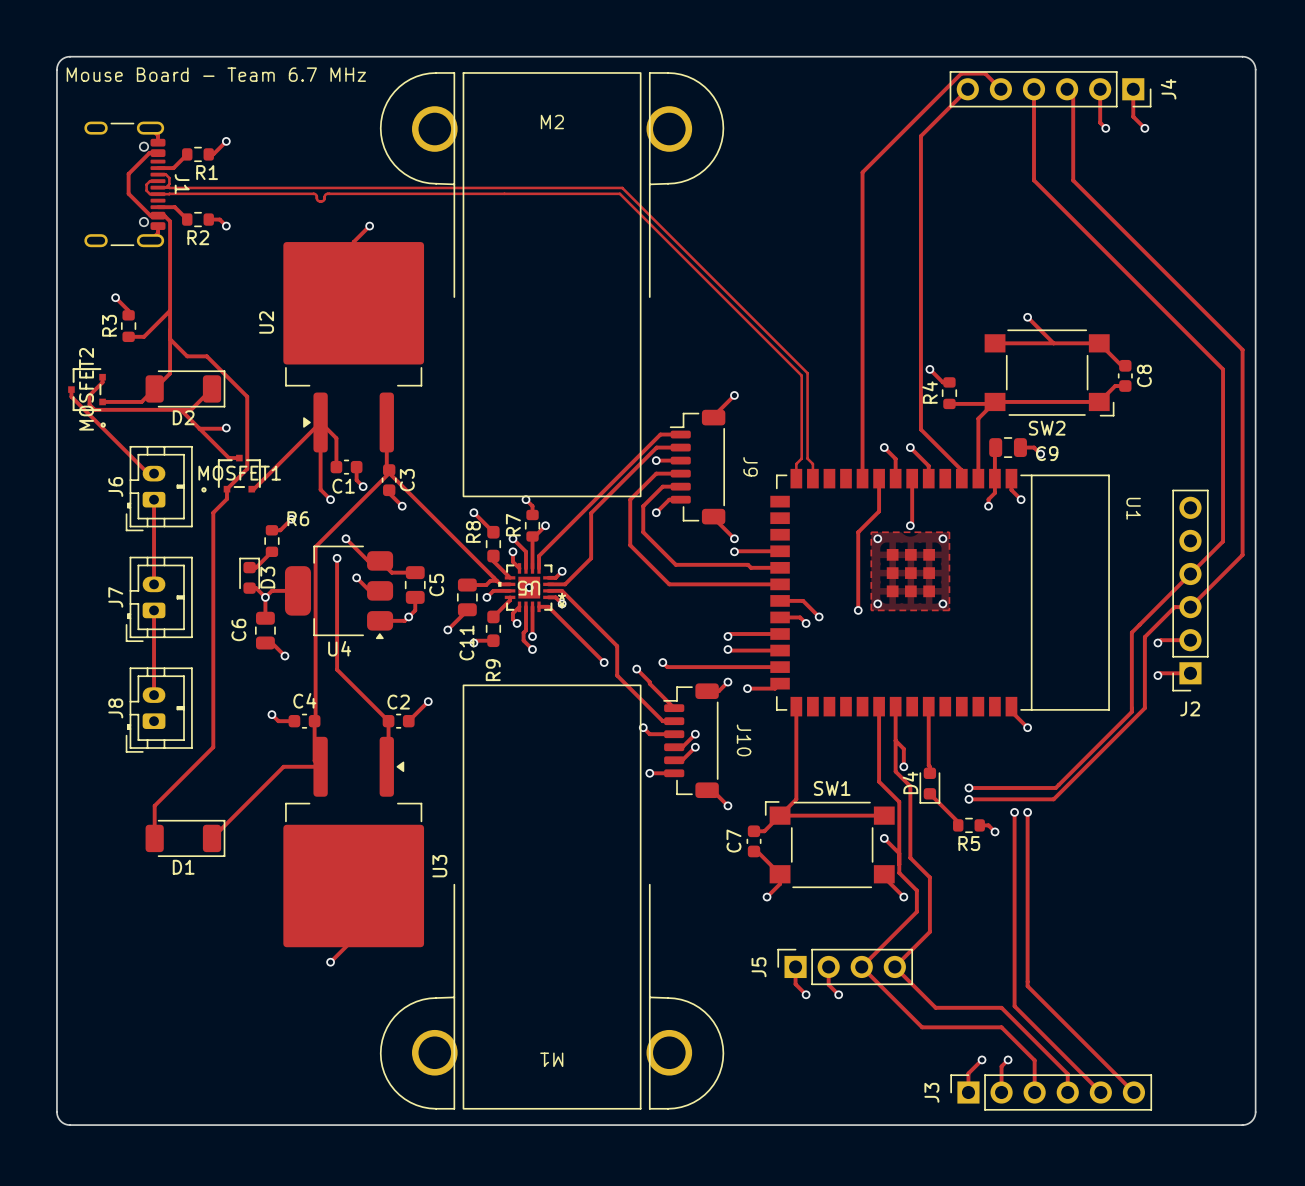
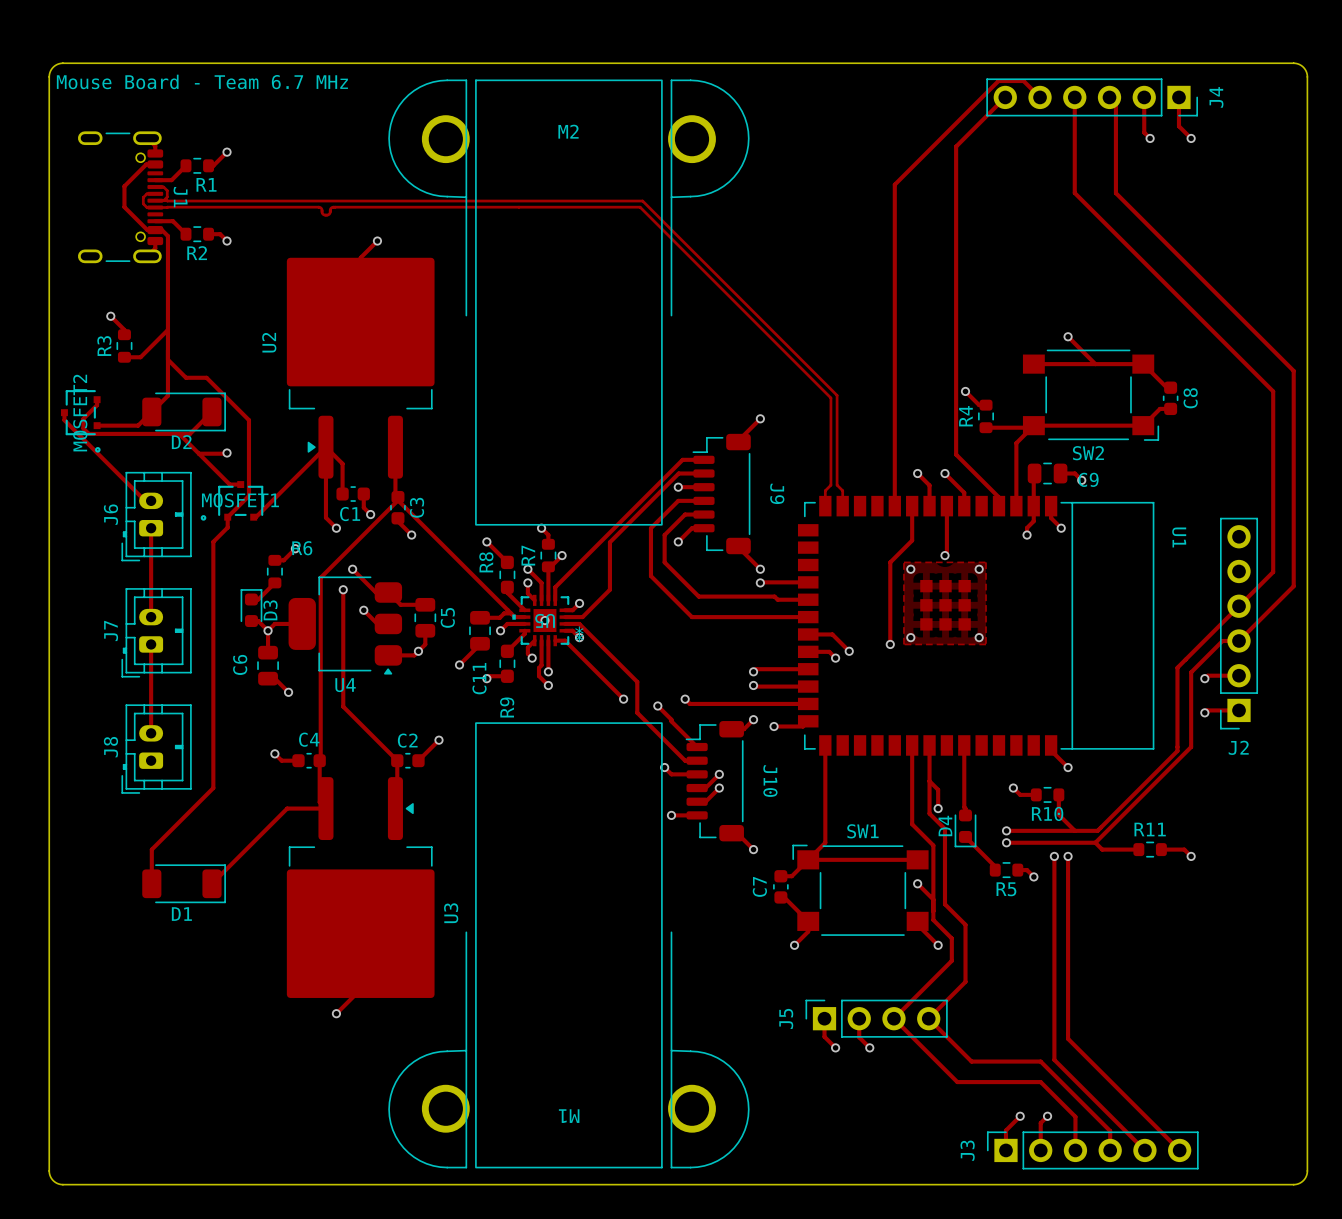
track: none -> (1013, 788) (1020, 794) (1036, 794)
via: none -> (1013, 788)
R10: none -> (1047, 794)
track: none -> (1058, 794) (1058, 814) (1074, 830)
track: none -> (1095, 842) (1102, 849) (1138, 849)
R11: none -> (1150, 849)
track: none -> (1161, 849) (1184, 849) (1191, 856)
via: none -> (1191, 856)

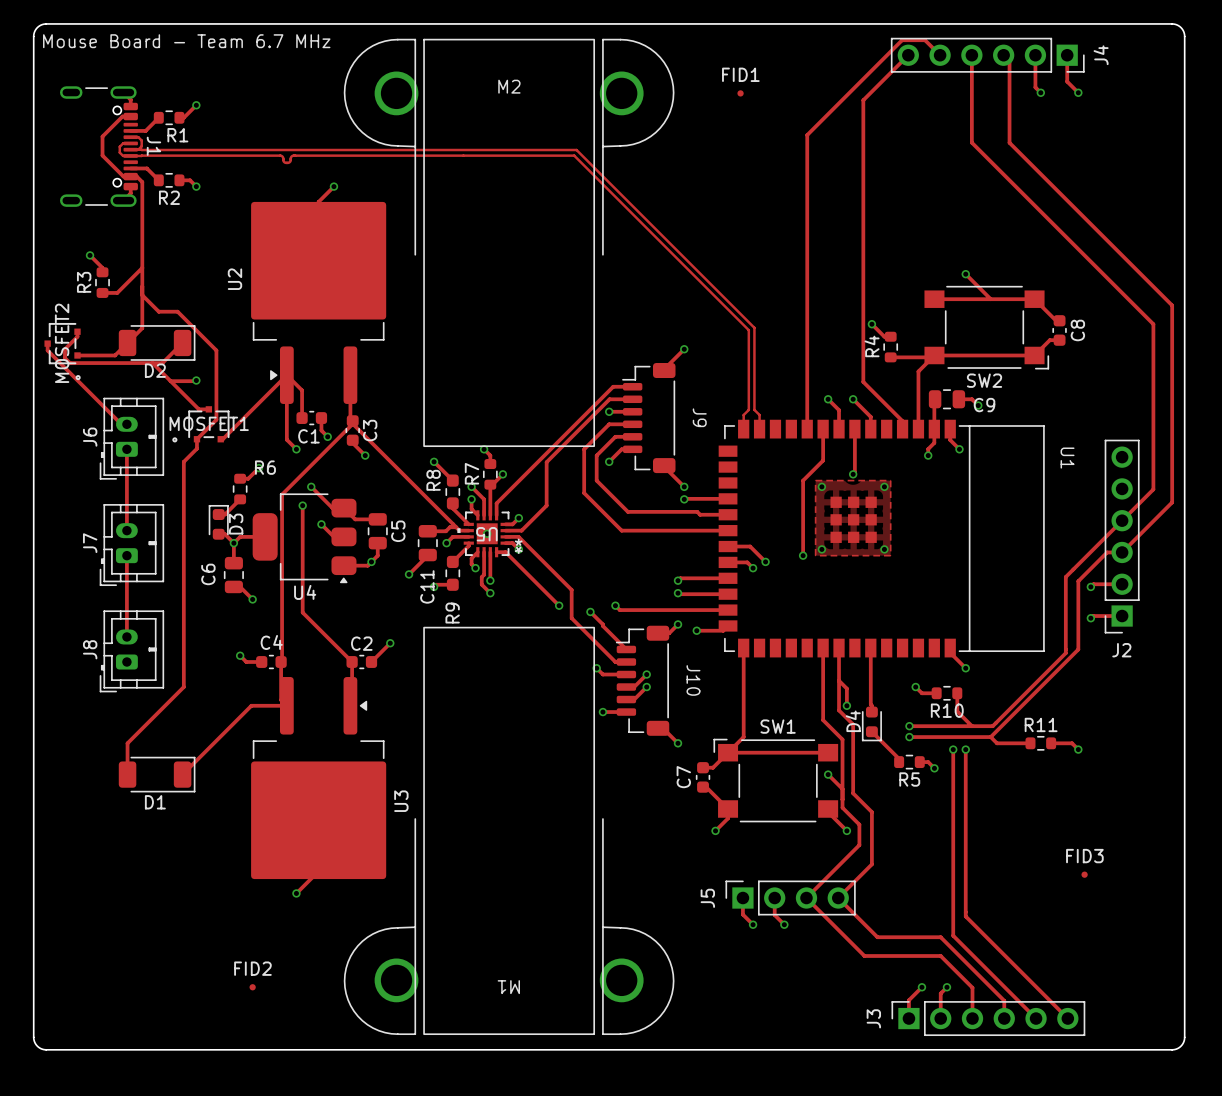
FID1: none -> (740, 93)
FID3: none -> (1084, 874)
FID2: none -> (252, 987)

